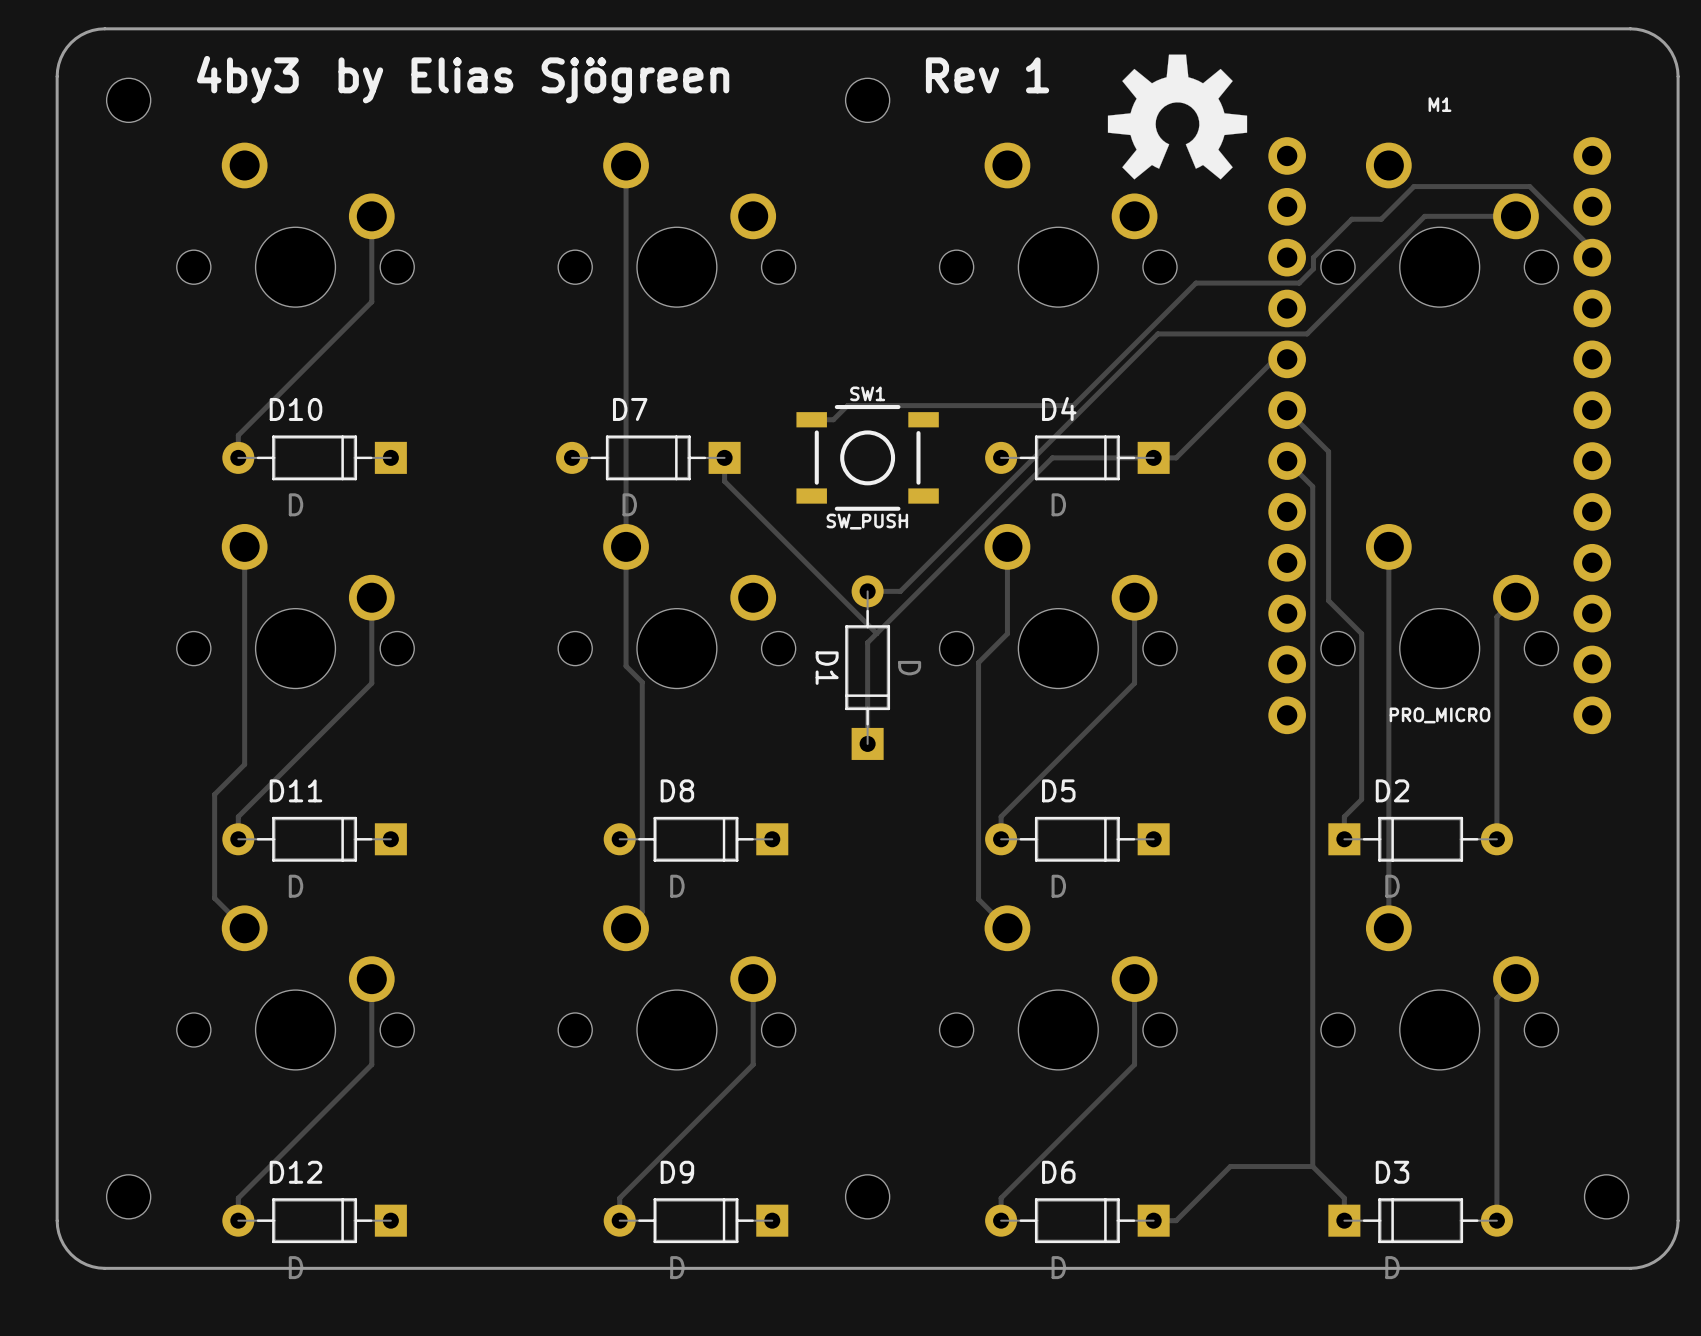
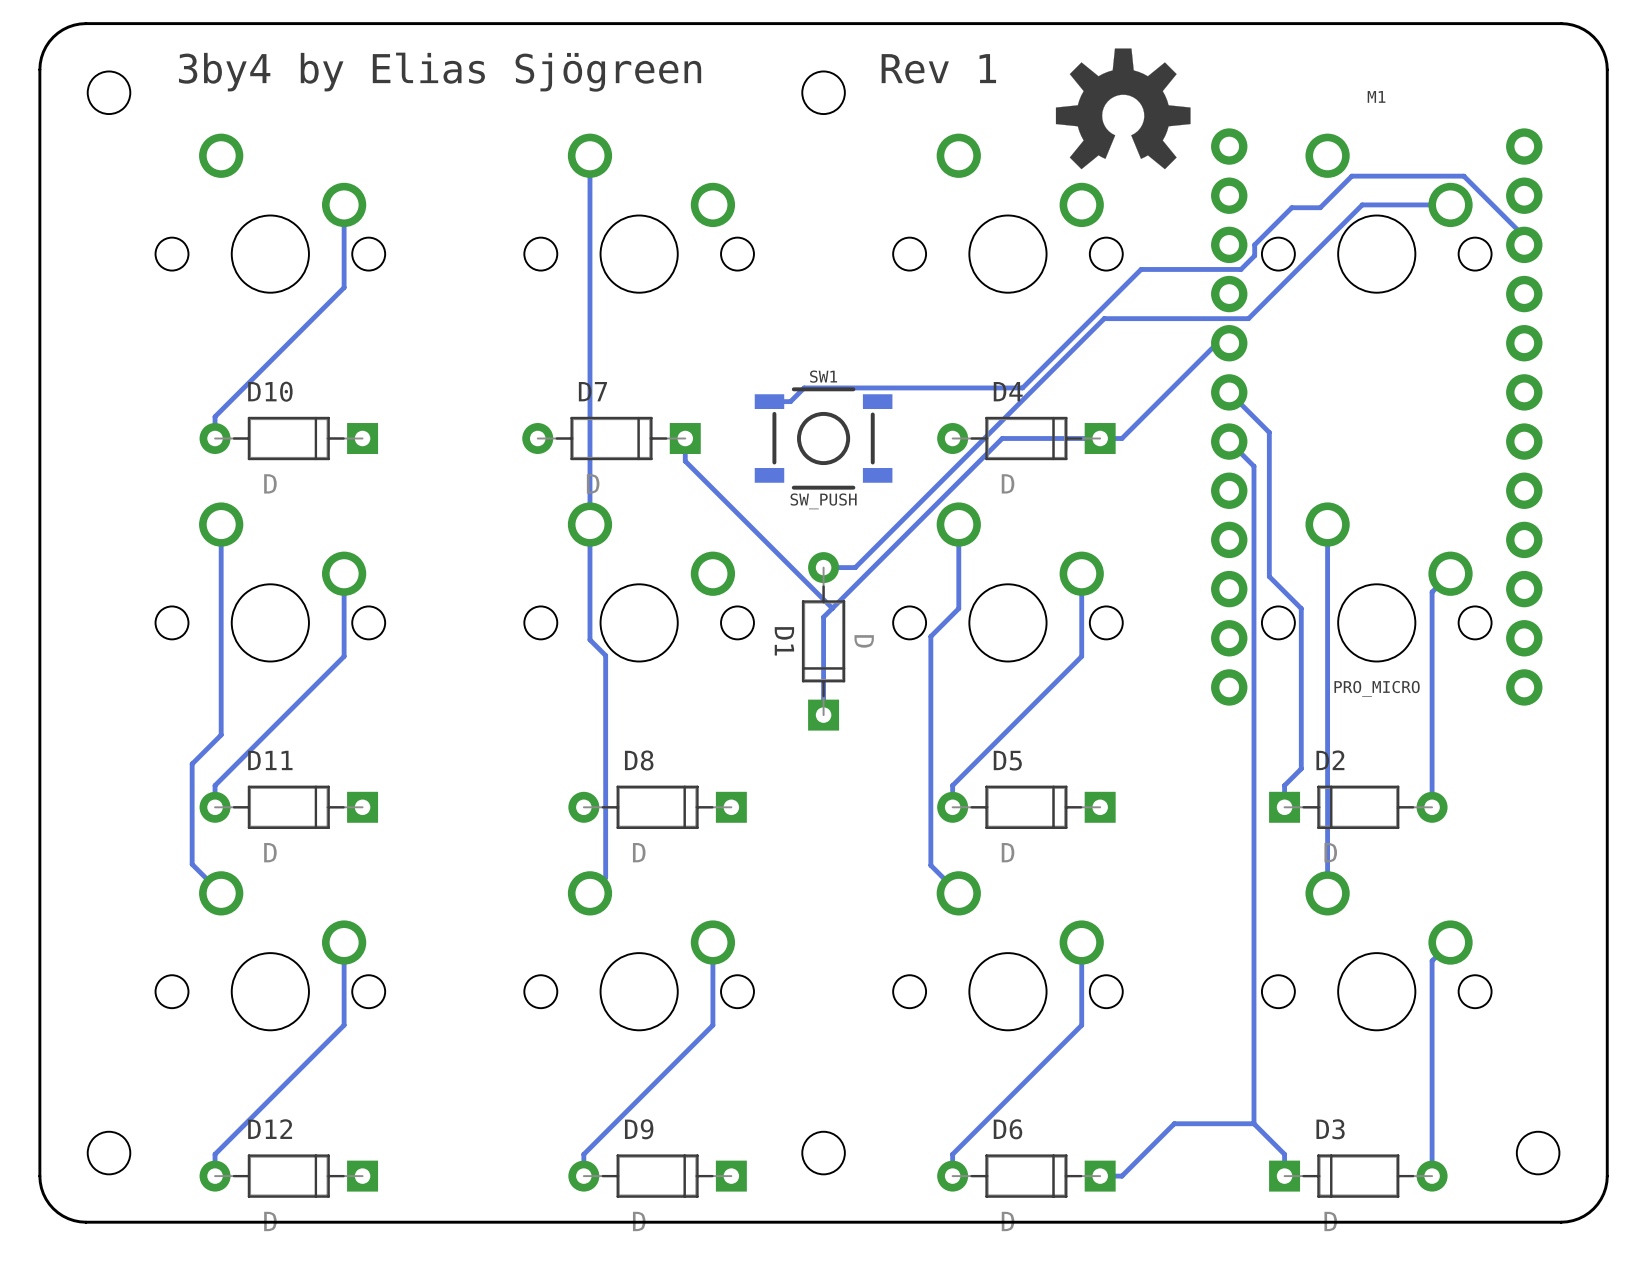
text: 4by3 (247, 79) -> 3by4 (224, 72)

